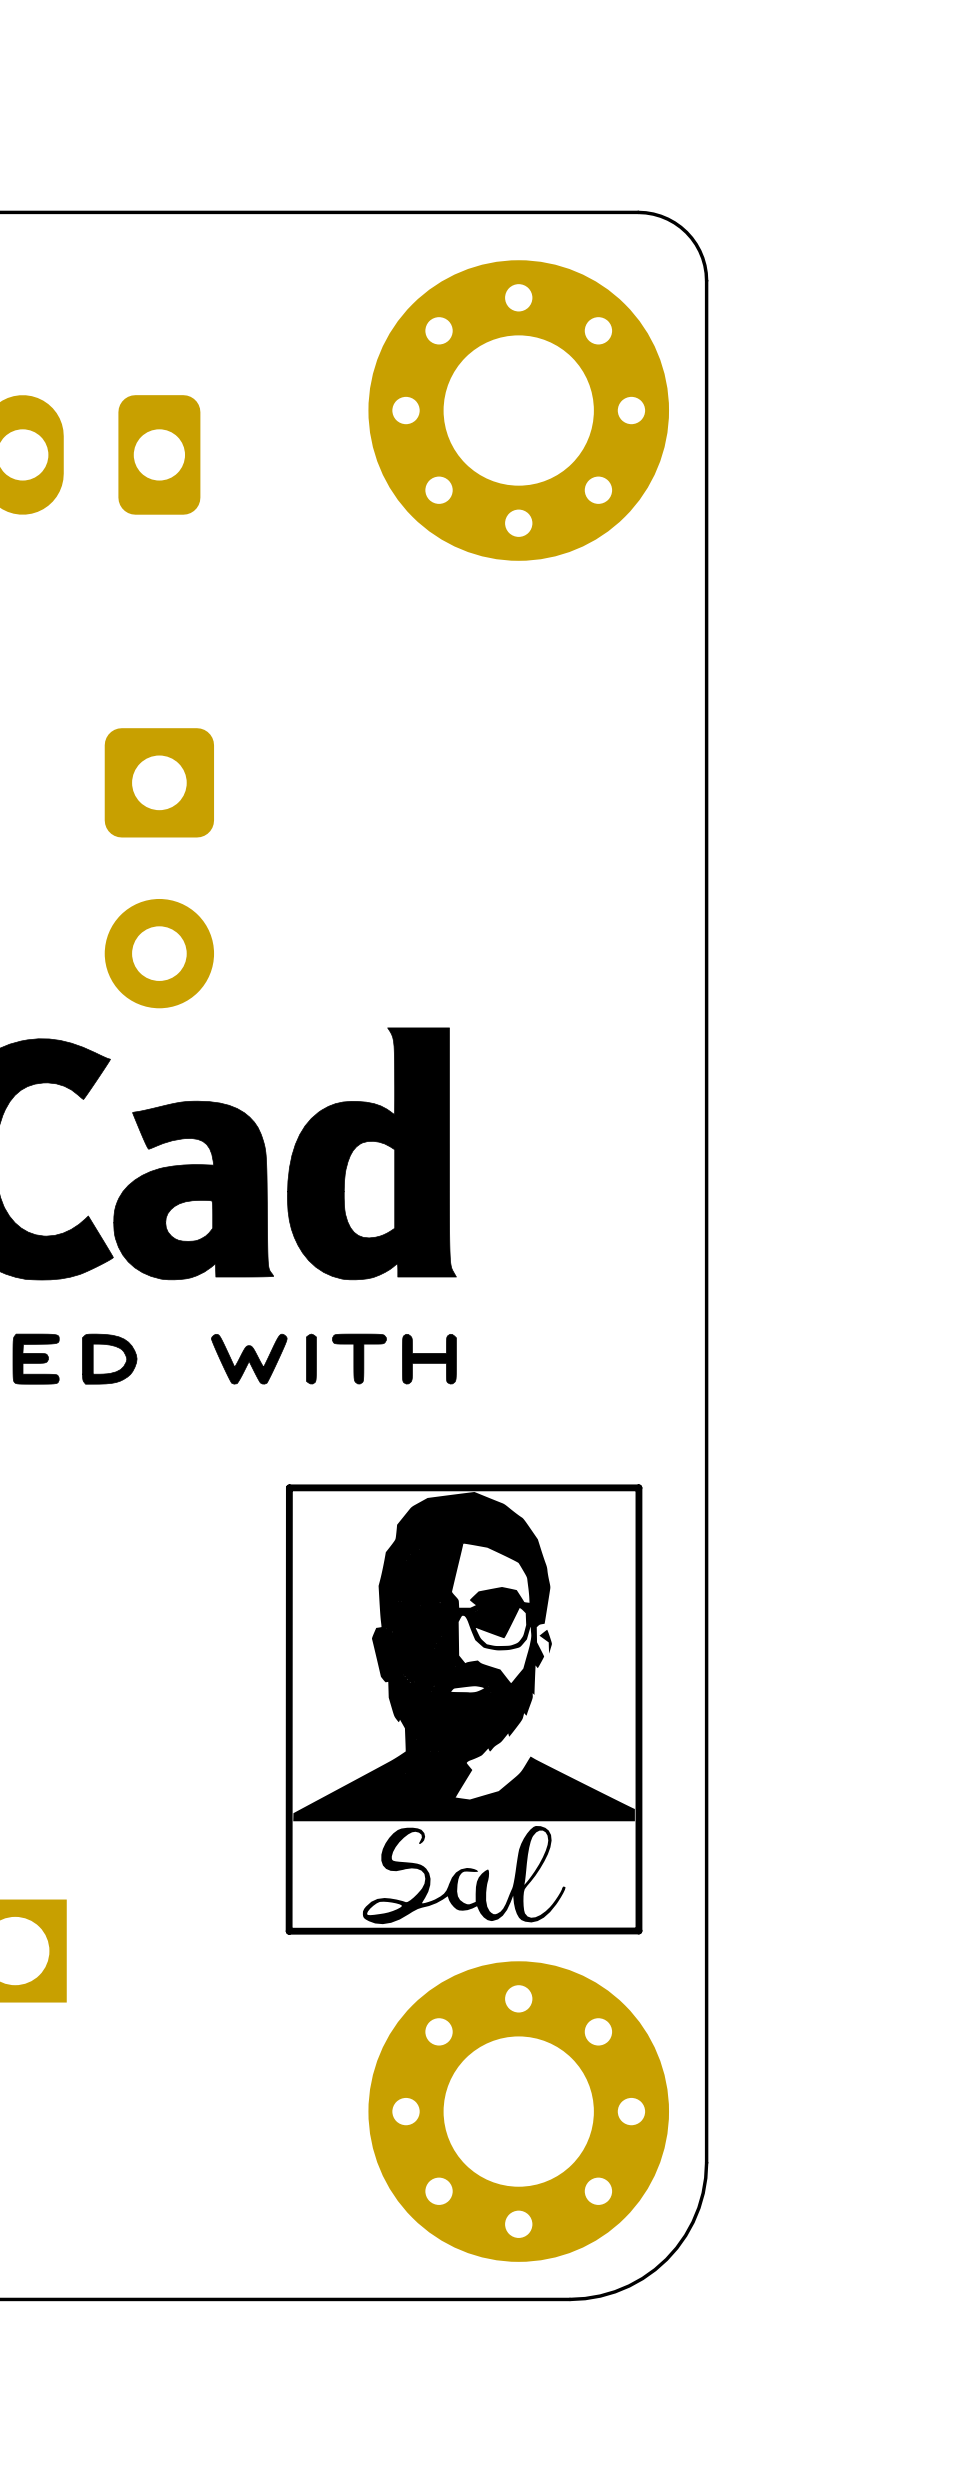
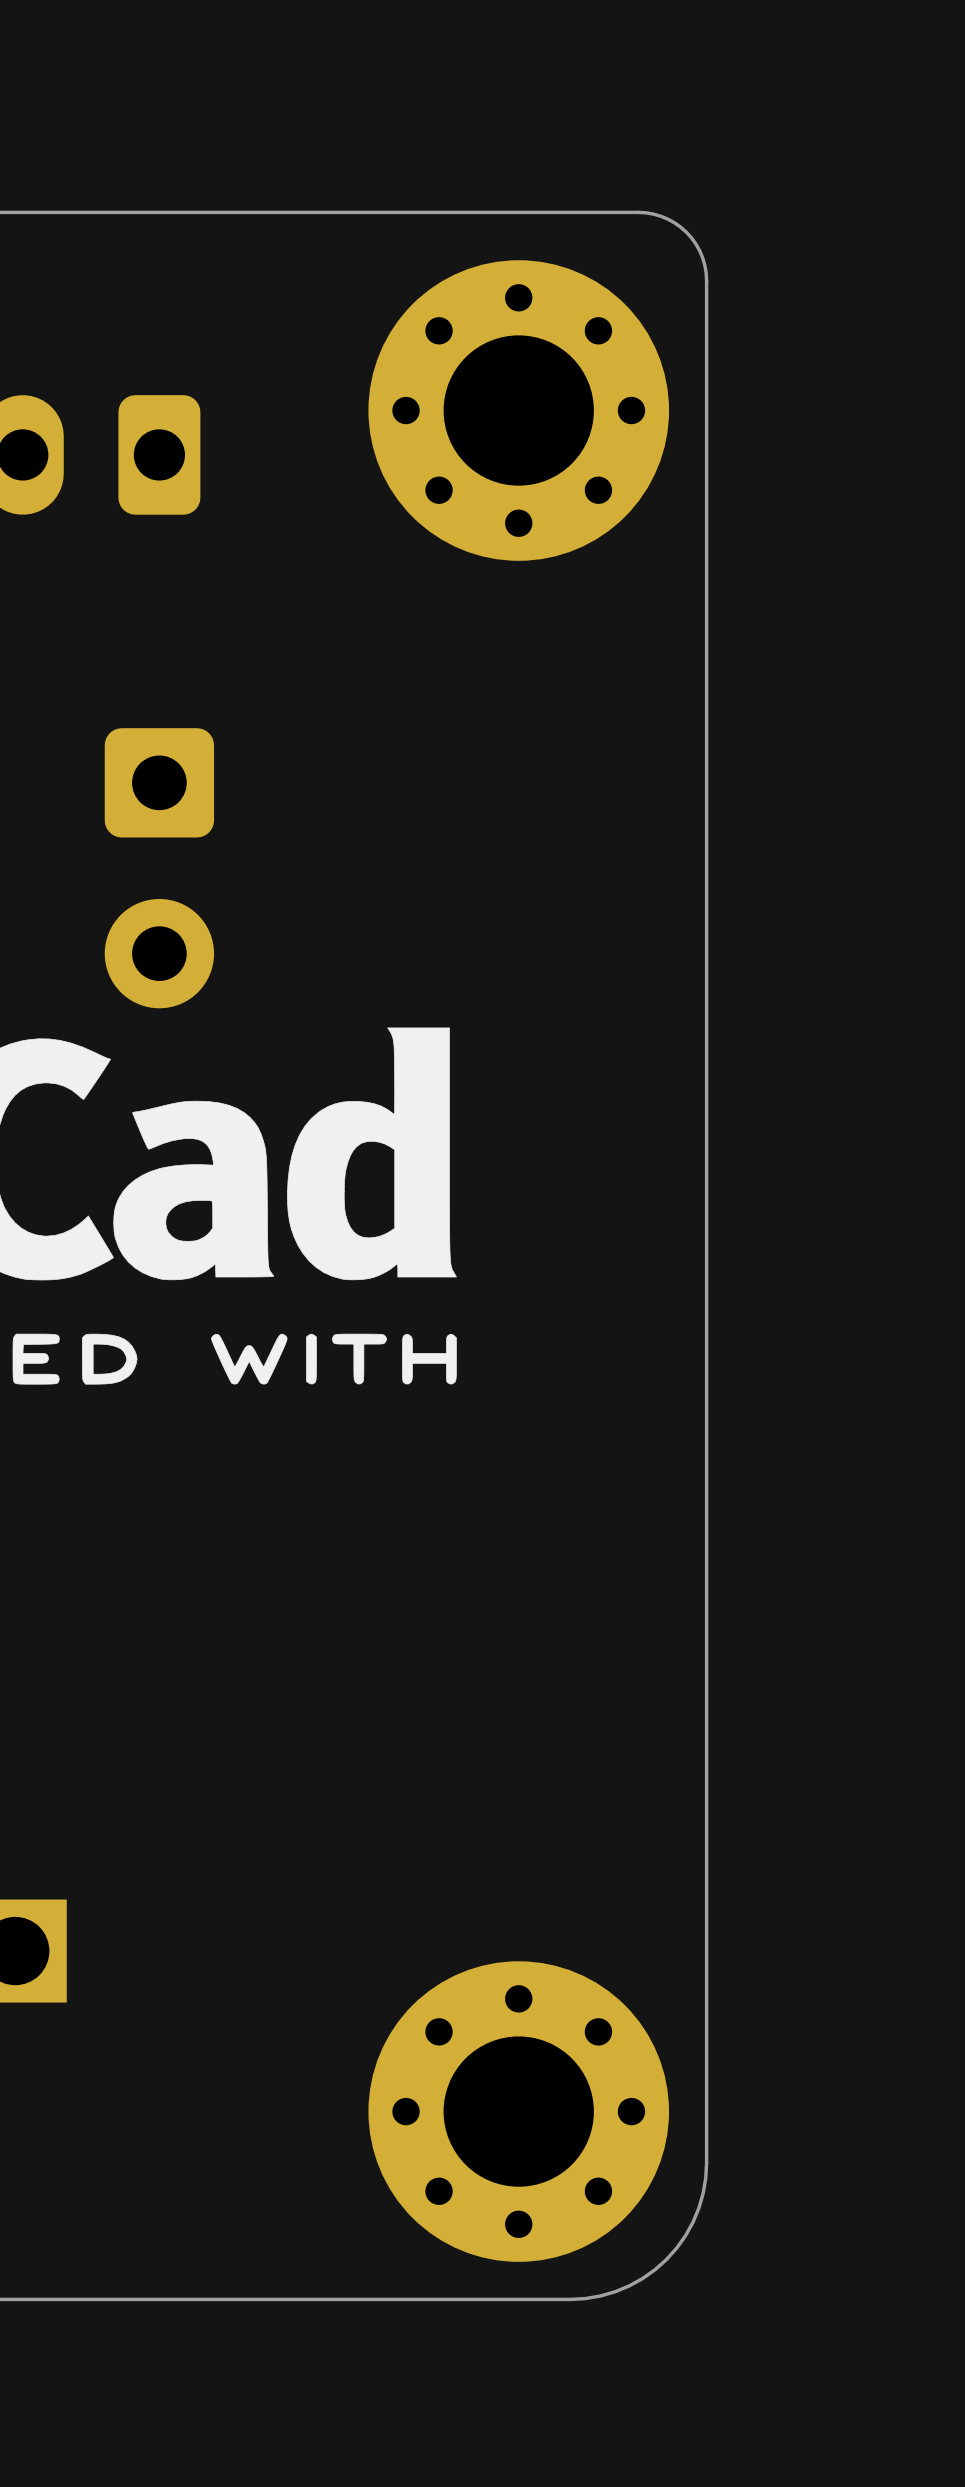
line: (638, 1487) (638, 1930) (289, 1931) (289, 1487) (638, 1487) -> none
drawing: [293, 1491, 635, 1925] -> none

